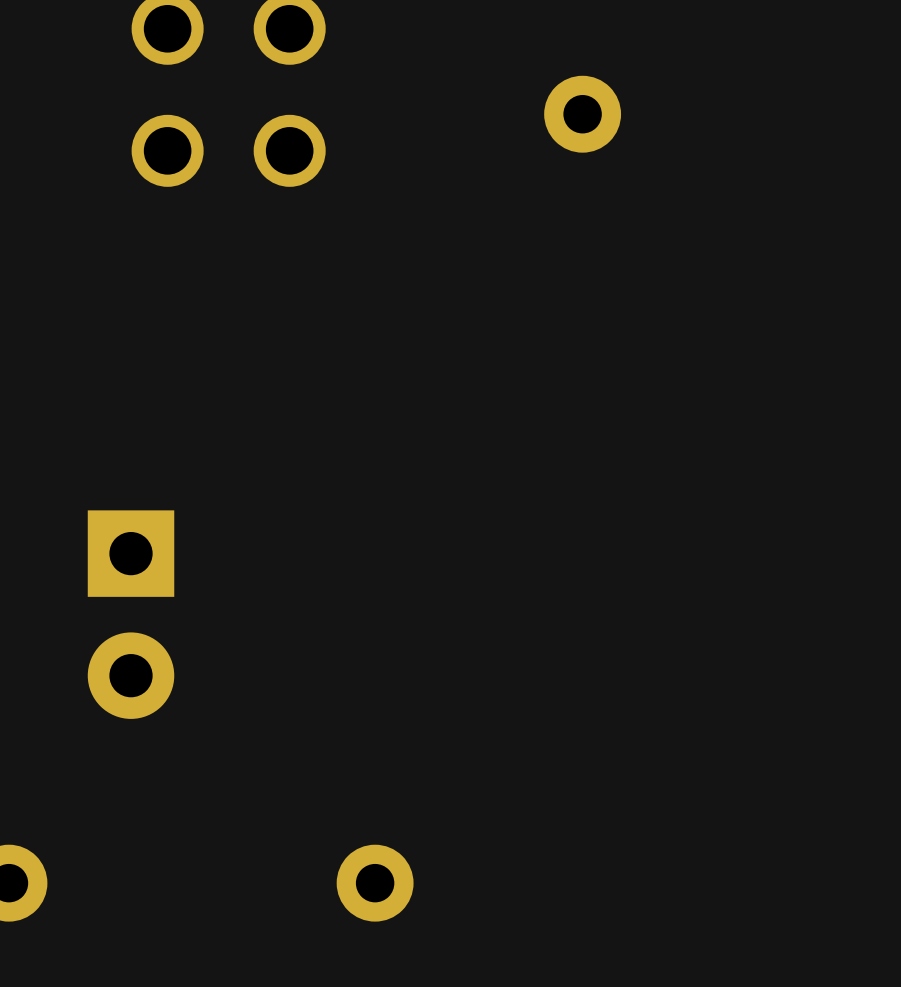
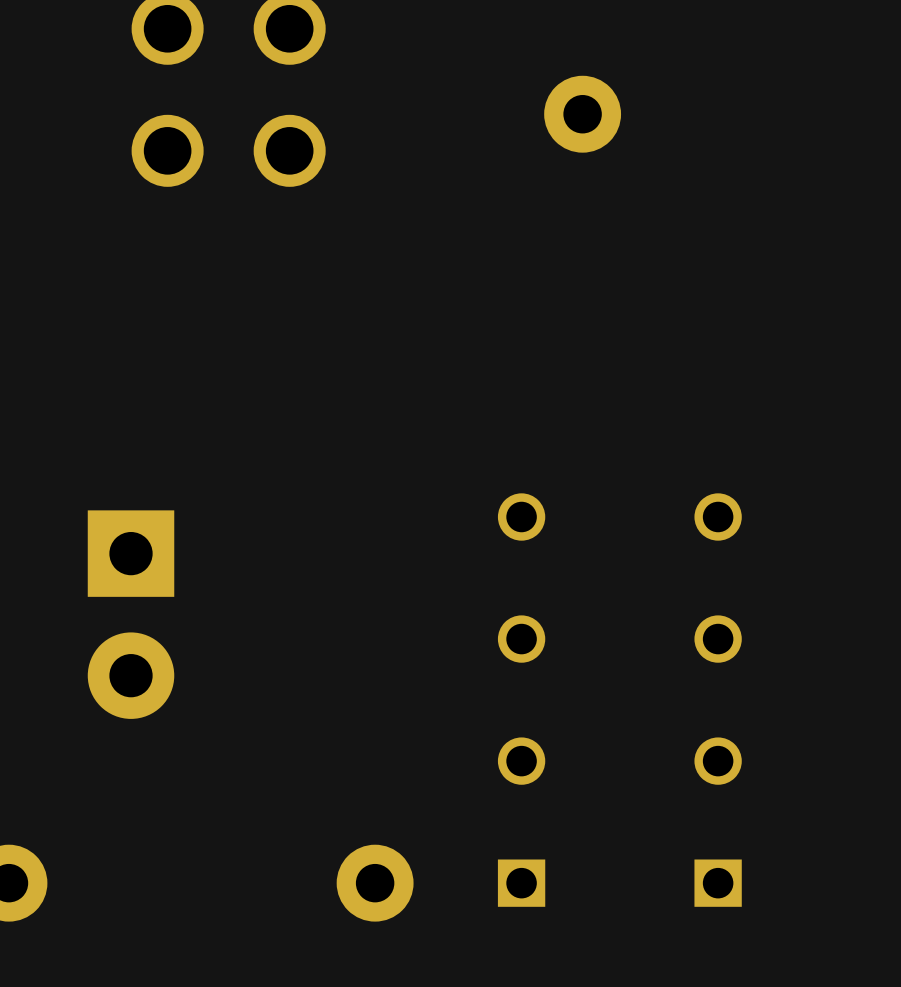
part: none -> (521, 700)
part: none -> (718, 700)

